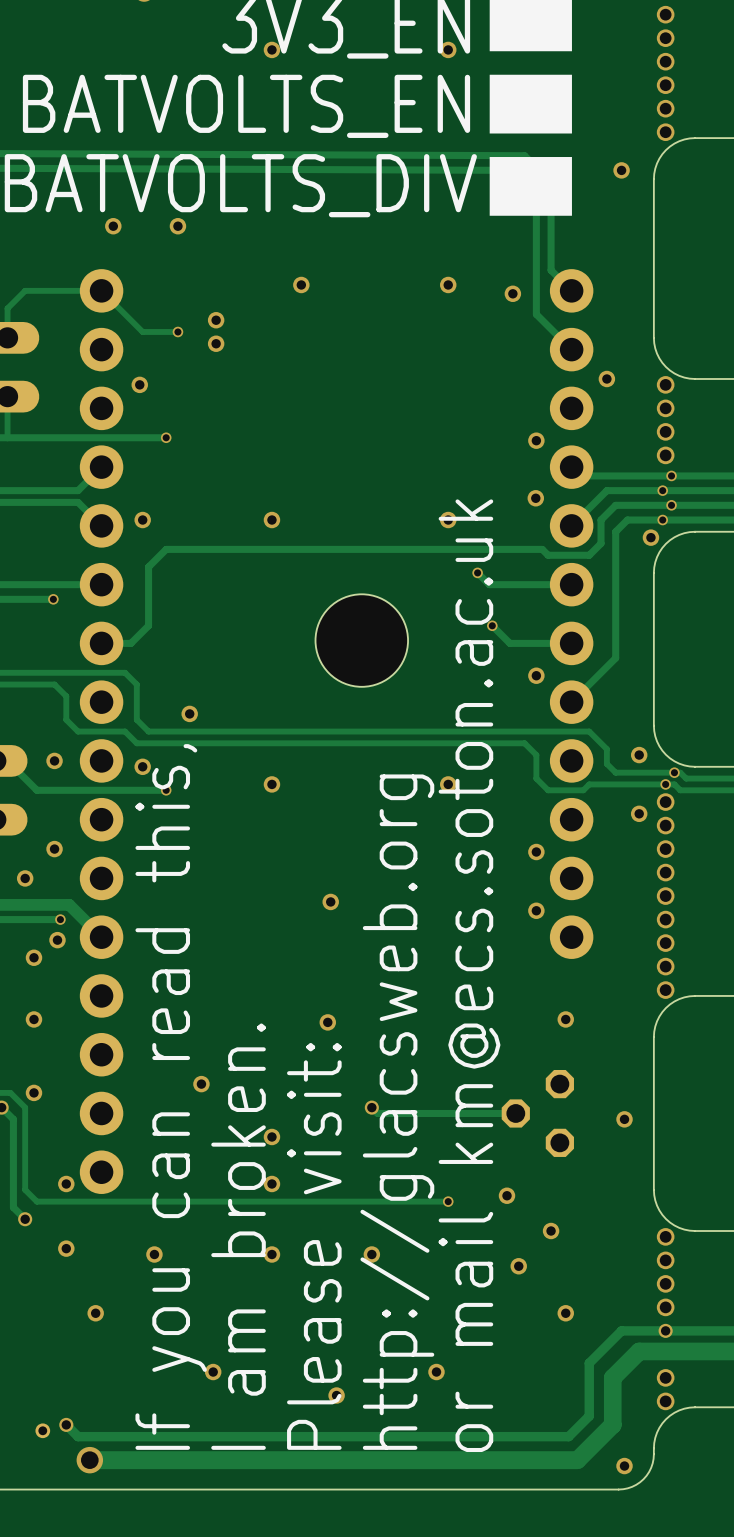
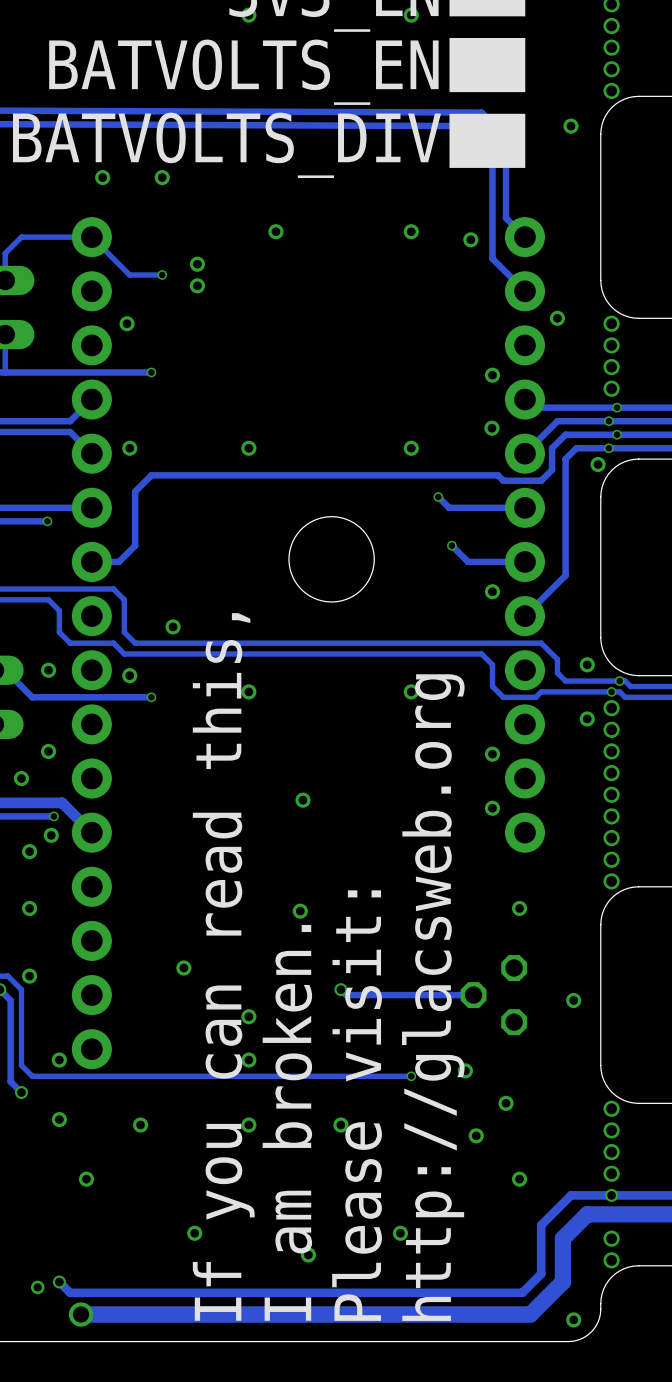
text: or mail km@ecs.soton.ac.uk (469, 975) -> none
text position: If you can read this, (171, 1096) -> If you can read this, (223, 966)
text position: http://glacsweb.org (397, 1112) -> http://glacsweb.org (433, 997)
text position: I am broken. (238, 1236) -> I am broken. (287, 1122)
text position: Please visit: (314, 1246) -> Please visit: (357, 1105)

